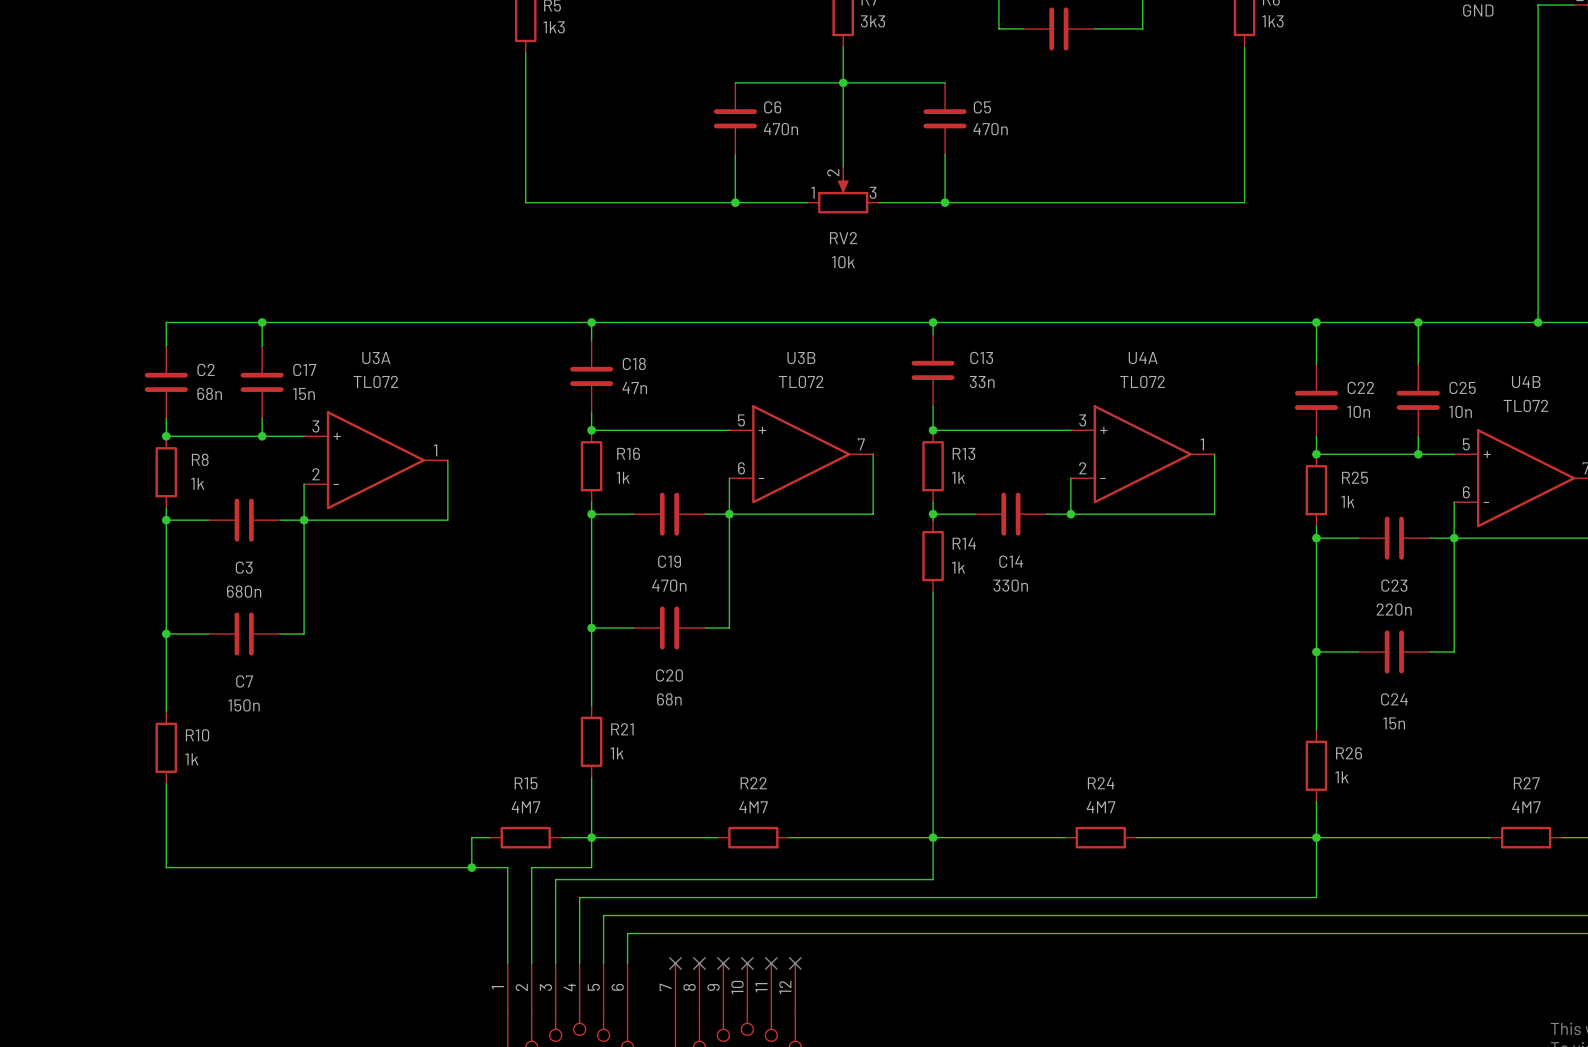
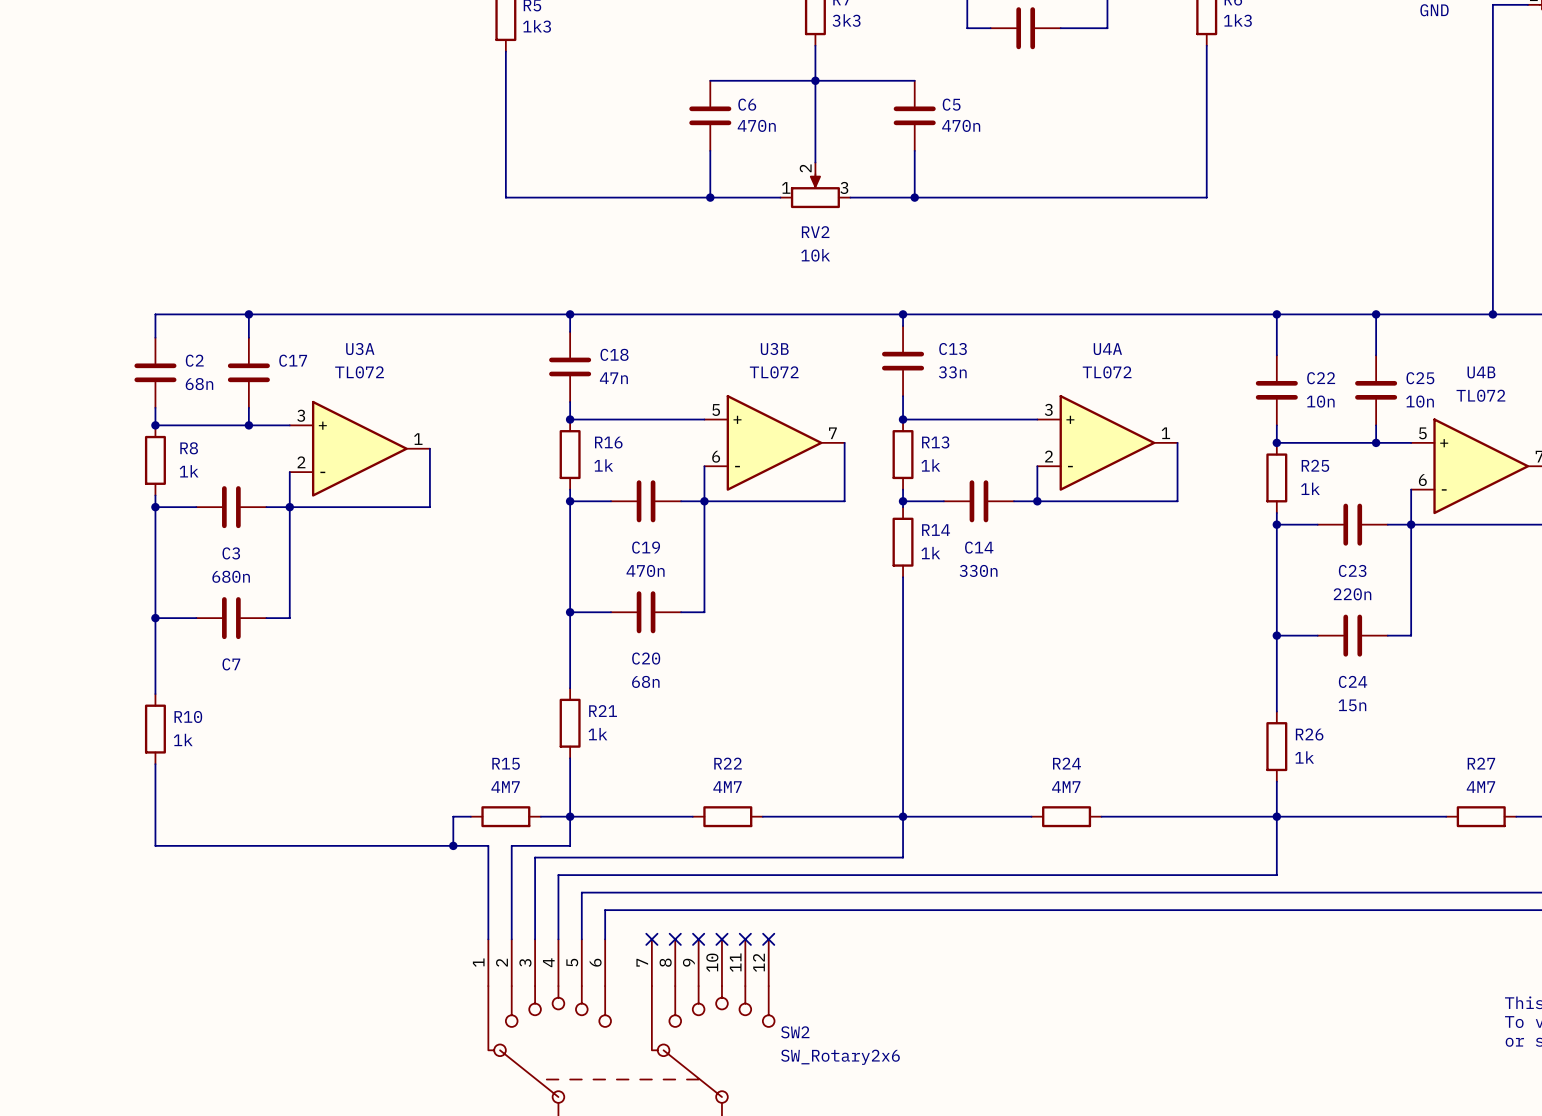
C17 value: 15n (303, 393) -> none
C7 value: 150n (244, 705) -> none

